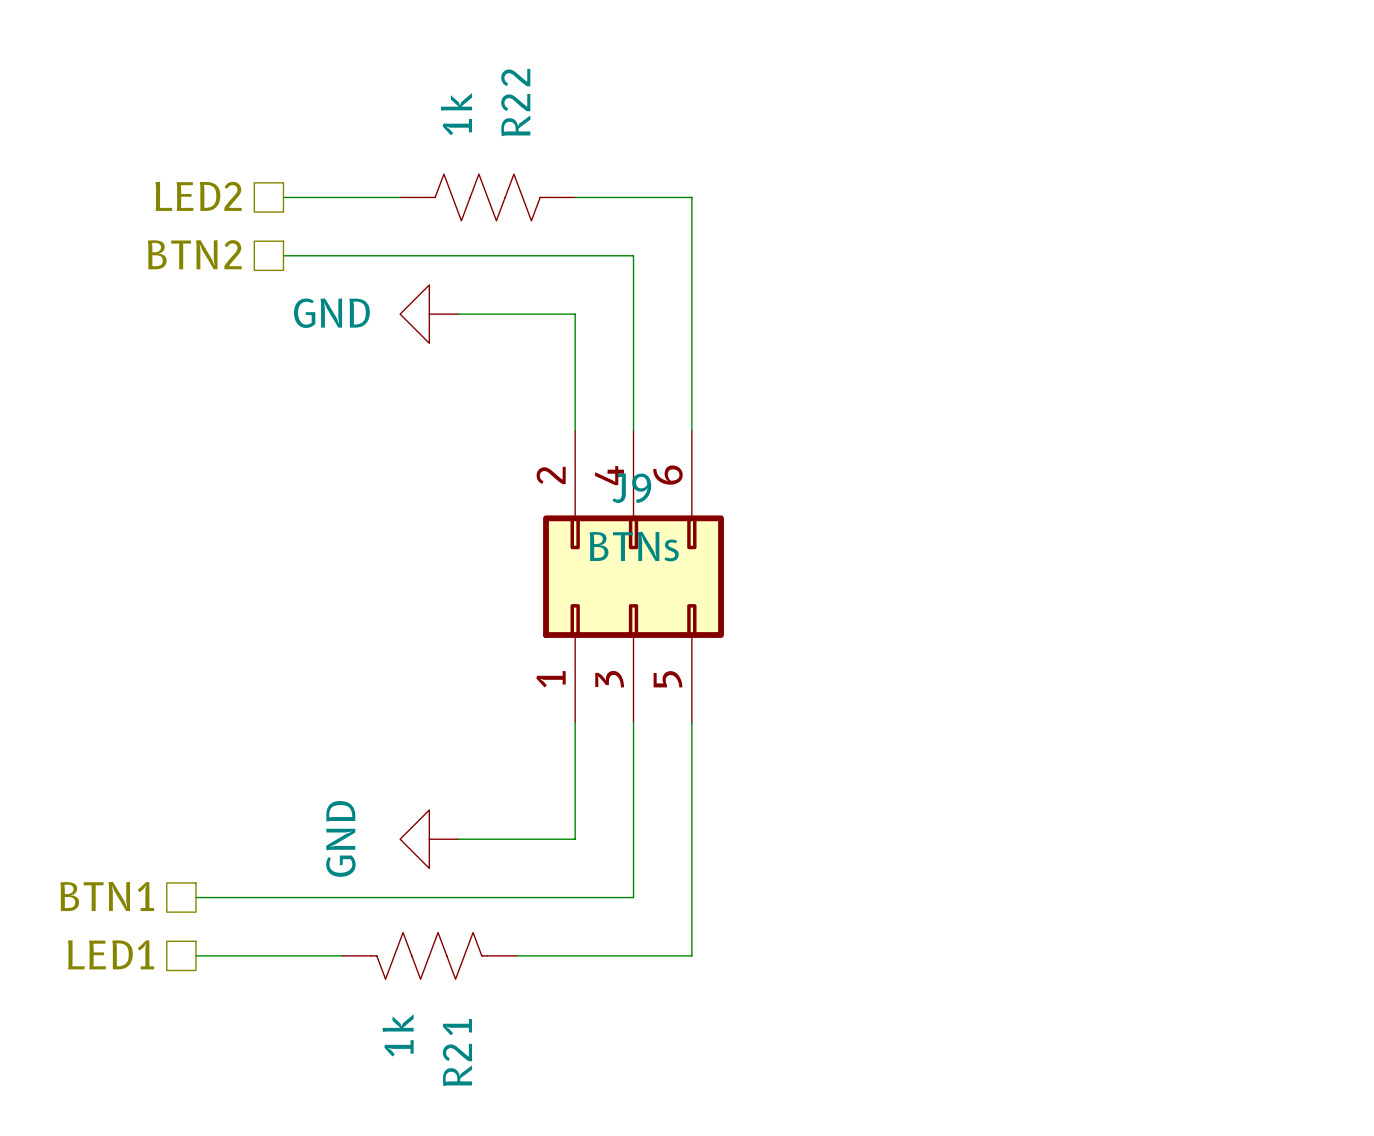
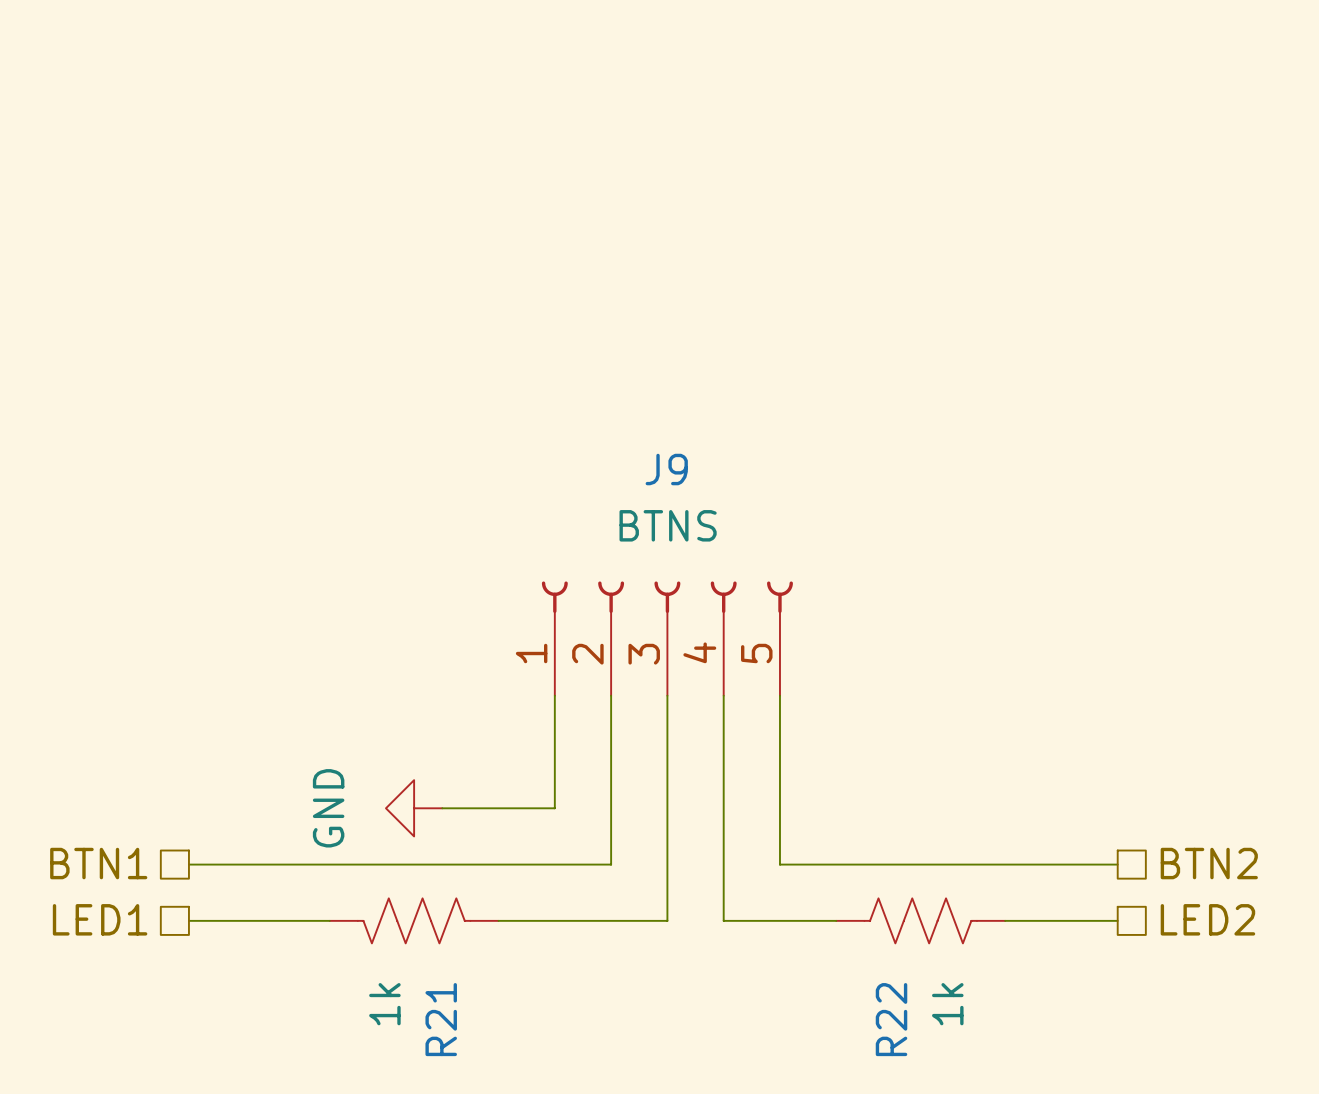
R22 name position: R22 (515, 102) -> R22 (891, 1019)
R22 value position: 1k (456, 114) -> 1k (947, 1004)
hierarchical label: LED2 (198, 196) -> none
wire: (283, 197) (400, 197) -> none
R22 position: (487, 197) -> (920, 920)
wire: (575, 197) (691, 197) (691, 430) -> none
hierarchical label: BTN2 (194, 254) -> none
wire: (283, 255) (633, 255) (633, 430) -> none
power symbol: GND (429, 314) -> none
wire: (458, 314) (575, 314) (575, 430) -> none
J9 symbol: [543, 430, 724, 723] -> [541, 581, 793, 696]
J9 name position: J9 (631, 488) -> J9 (666, 469)
J9 value: BTNs (634, 546) -> BTNS (668, 525)
wire: none -> (723, 695) (723, 920) (836, 920)
wire: none -> (779, 695) (779, 864) (1117, 864)
hierarchical label: none -> BTN2 (1209, 863)
hierarchical label: none -> LED2 (1207, 919)
wire: none -> (1005, 920) (1117, 920)

